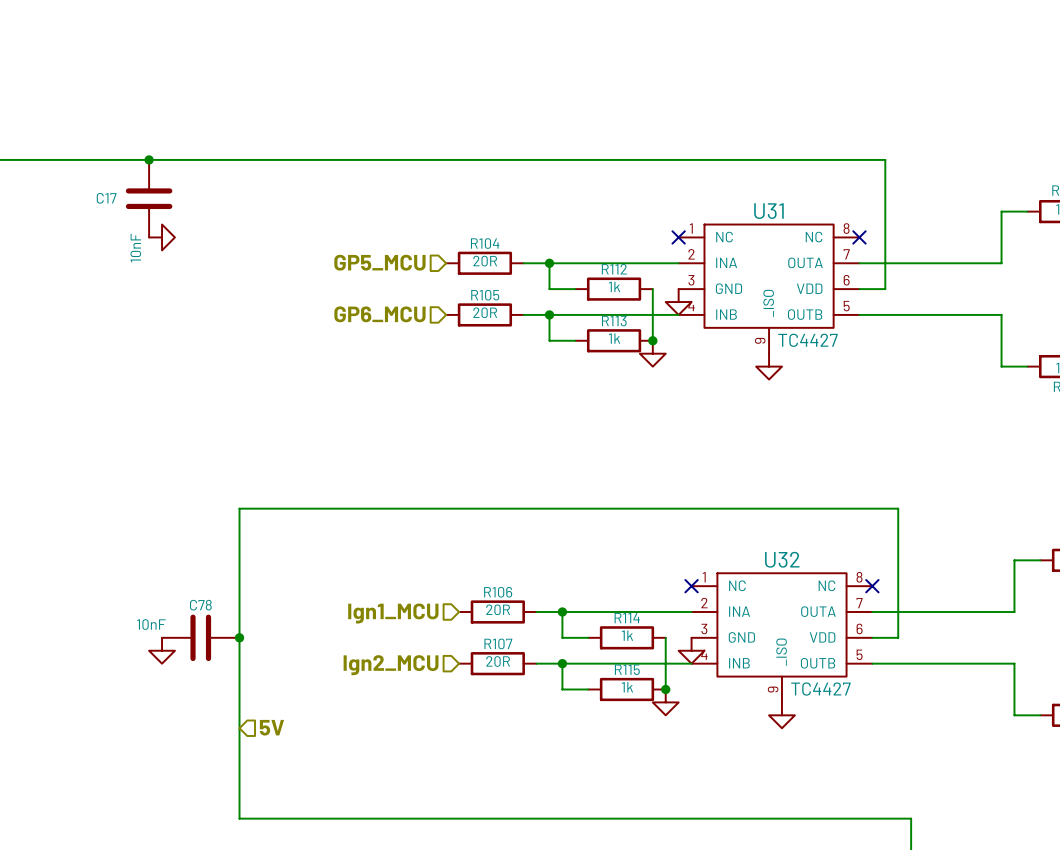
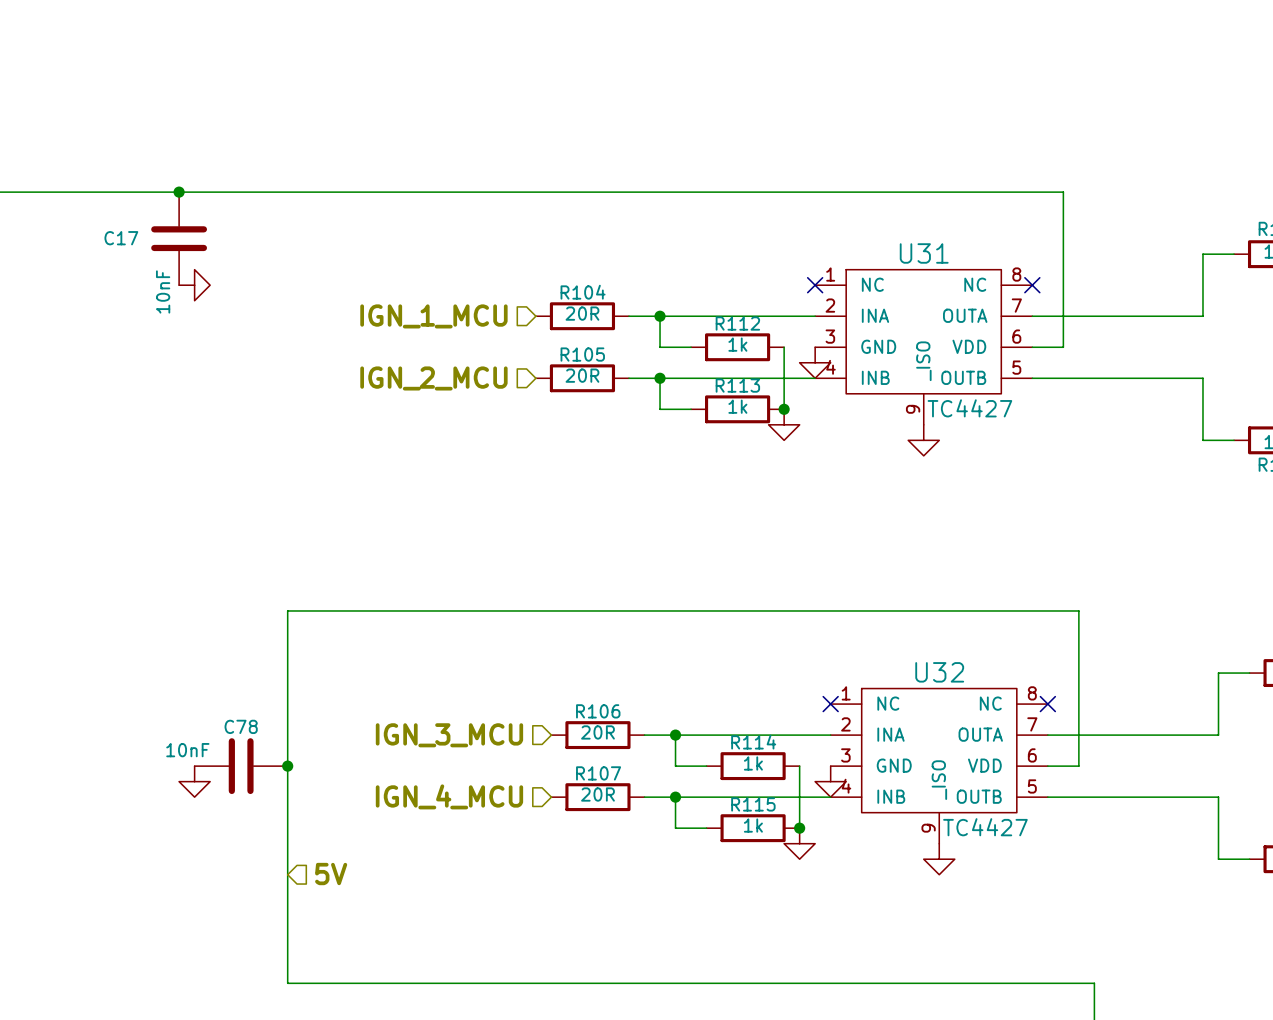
hierarchical label: GP5_MCU (379, 262) -> IGN_1_MCU (433, 316)
hierarchical label: GP6_MCU (379, 314) -> IGN_2_MCU (433, 378)
hierarchical label: Ign1_MCU (393, 613) -> IGN_3_MCU (449, 735)
hierarchical label: Ign2_MCU (391, 665) -> IGN_4_MCU (449, 796)

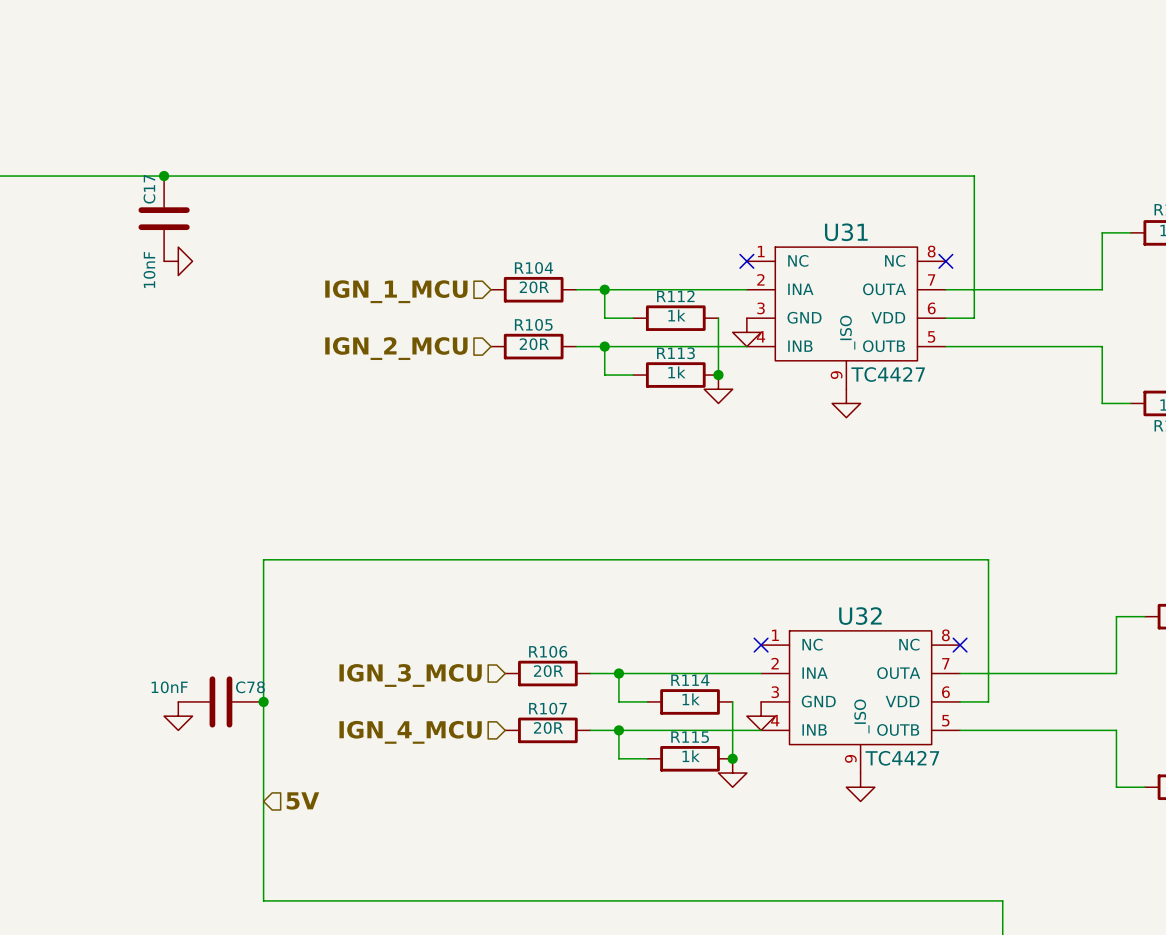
C17 name rotation: 0° (121, 238) -> 90° counterclockwise (149, 189)
C17 name position: C17 (121, 238) -> C17 (149, 189)
C78 name position: C78 (241, 726) -> C78 (250, 687)

